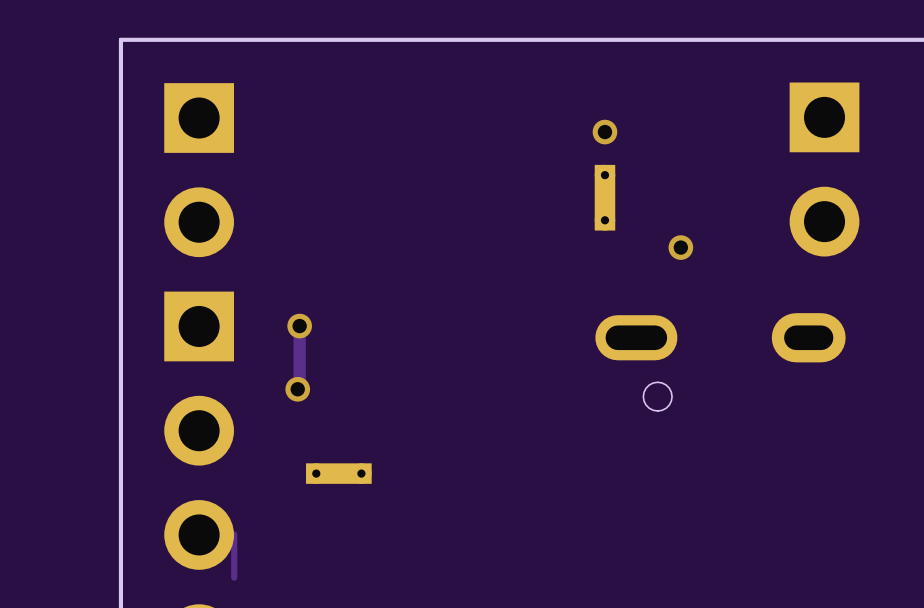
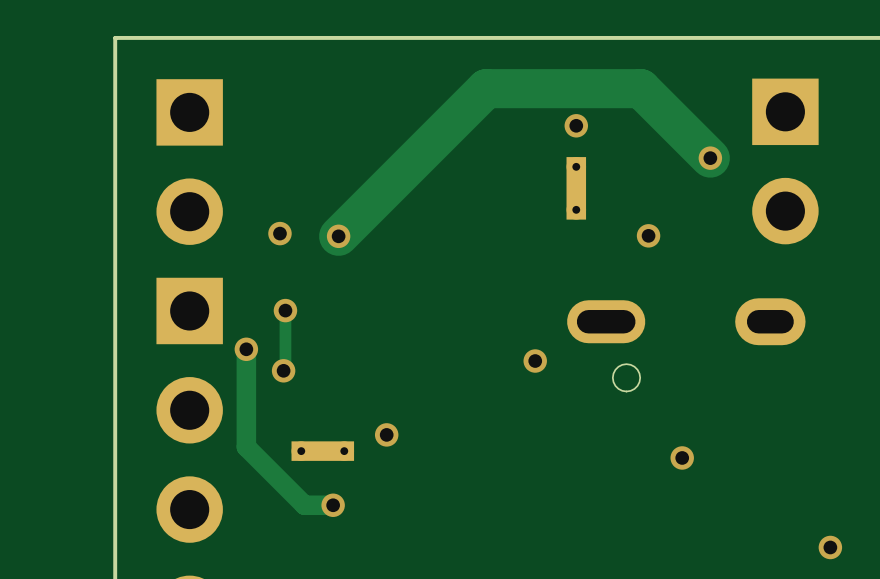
track: none -> (710, 158) (640, 88) (486, 88) (338, 236)
via: none -> (710, 158)
via: none -> (279, 233)
via: none -> (338, 236)
track: none -> (246, 349) (246, 447) (304, 505) (333, 505)
via: none -> (246, 349)
via: none -> (535, 361)
via: none -> (386, 434)
via: none -> (682, 457)
via: none -> (333, 505)
track: (234, 534) (234, 577) -> none
via: none -> (830, 547)

